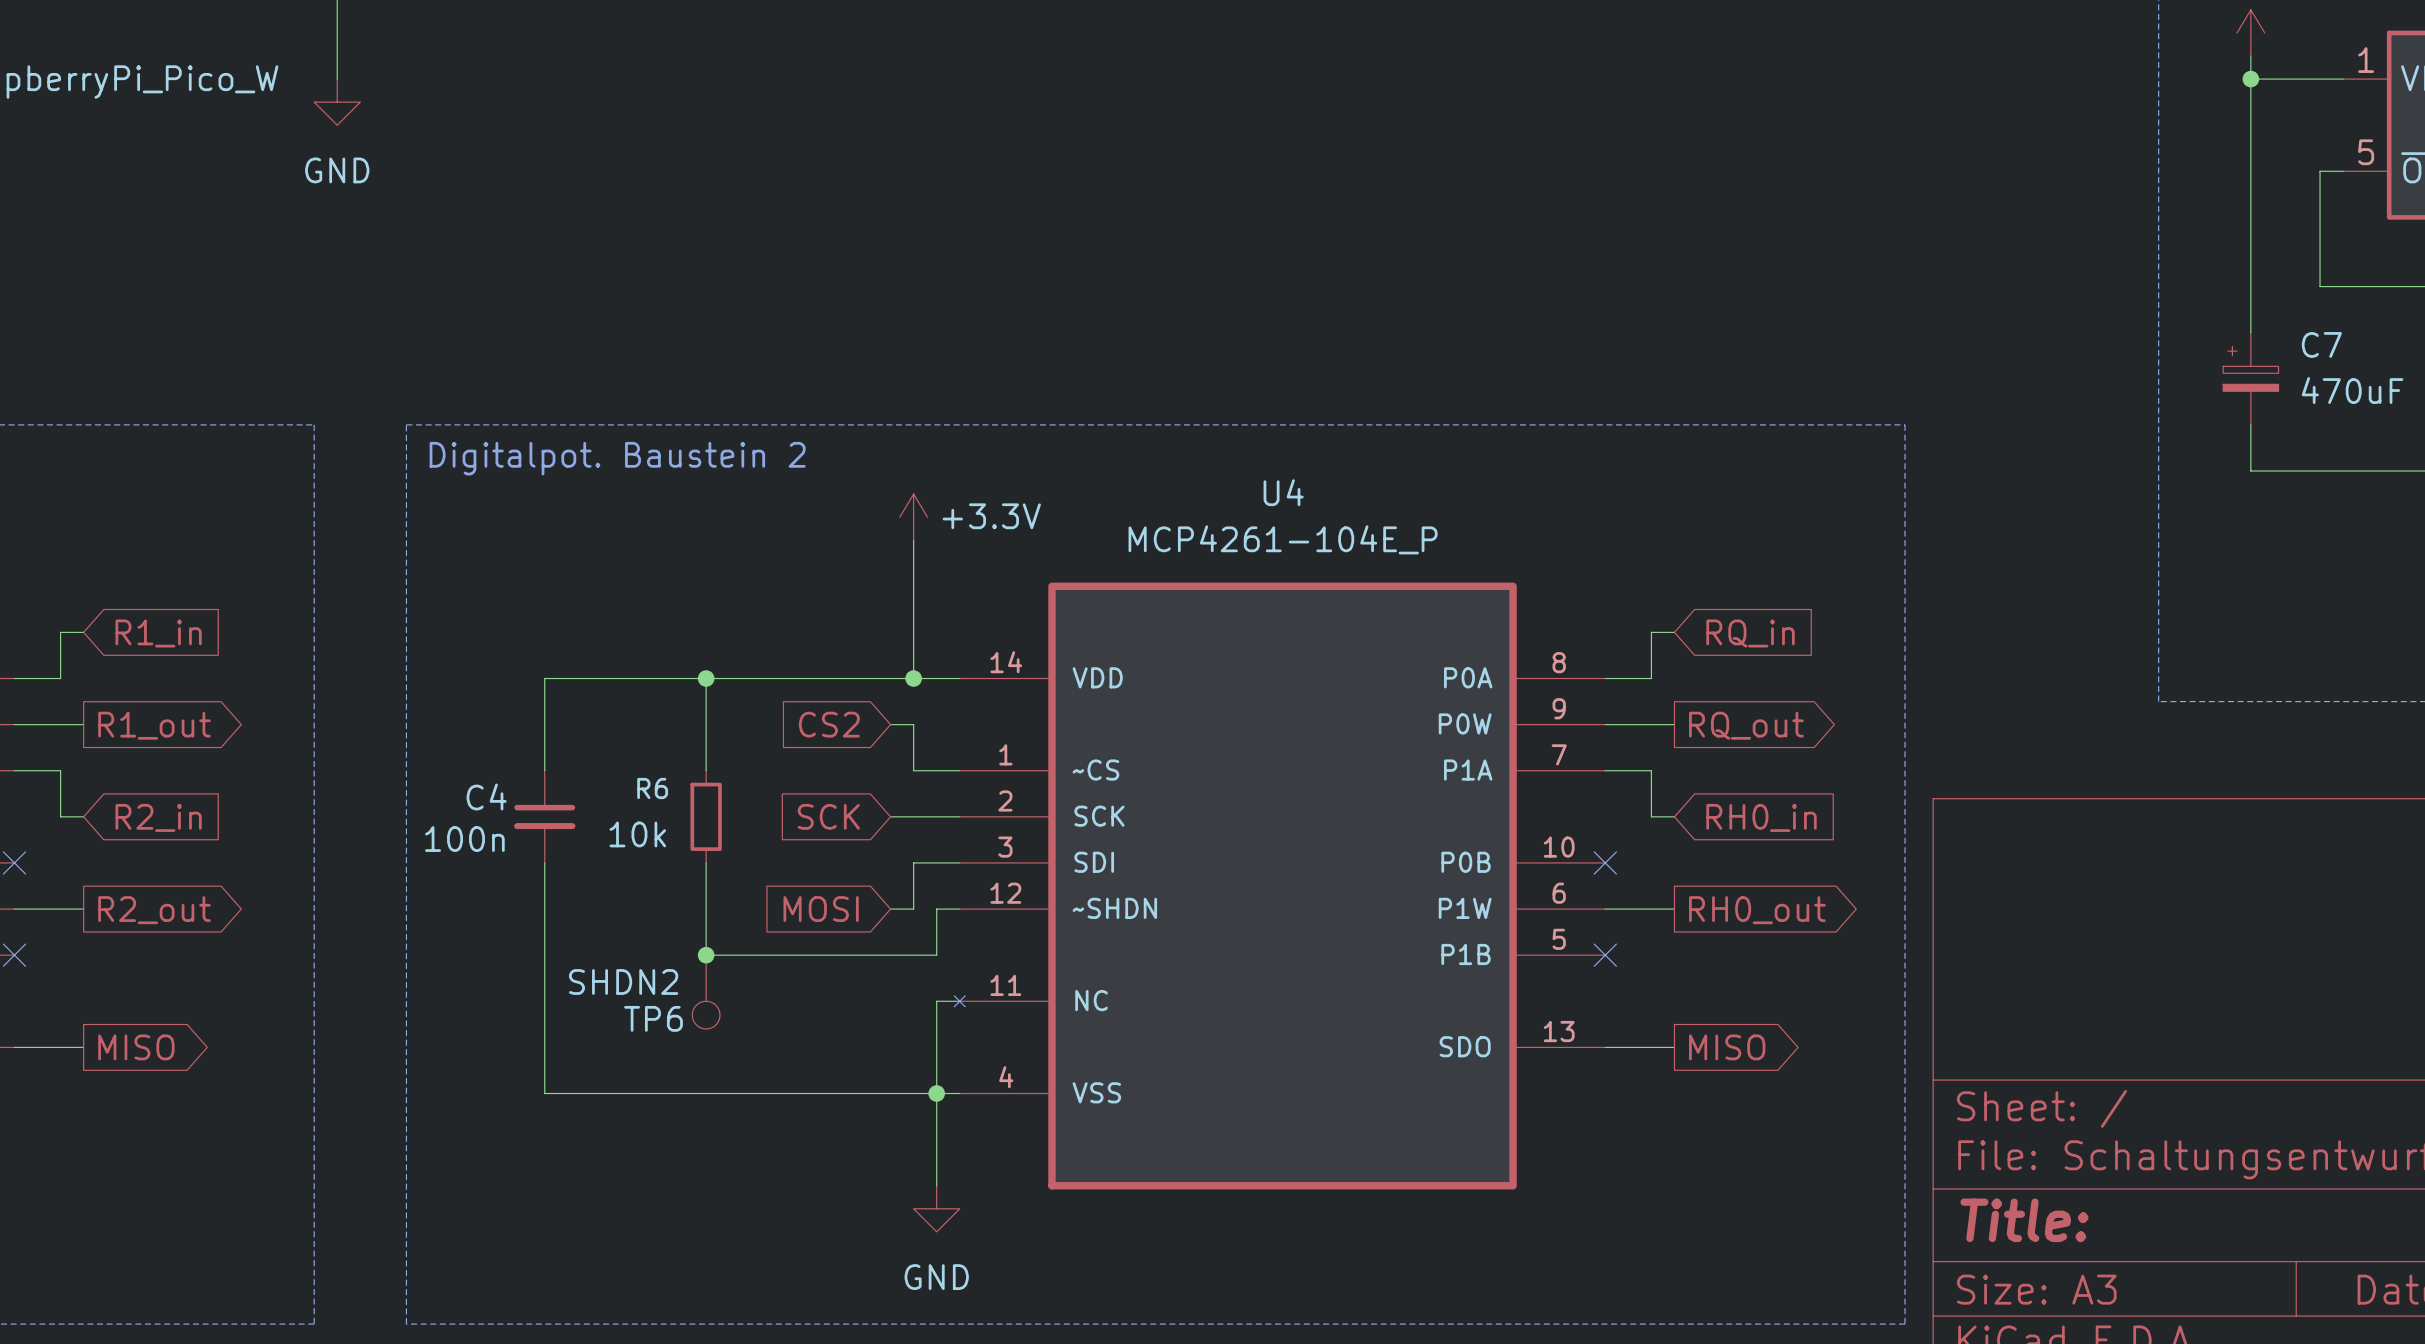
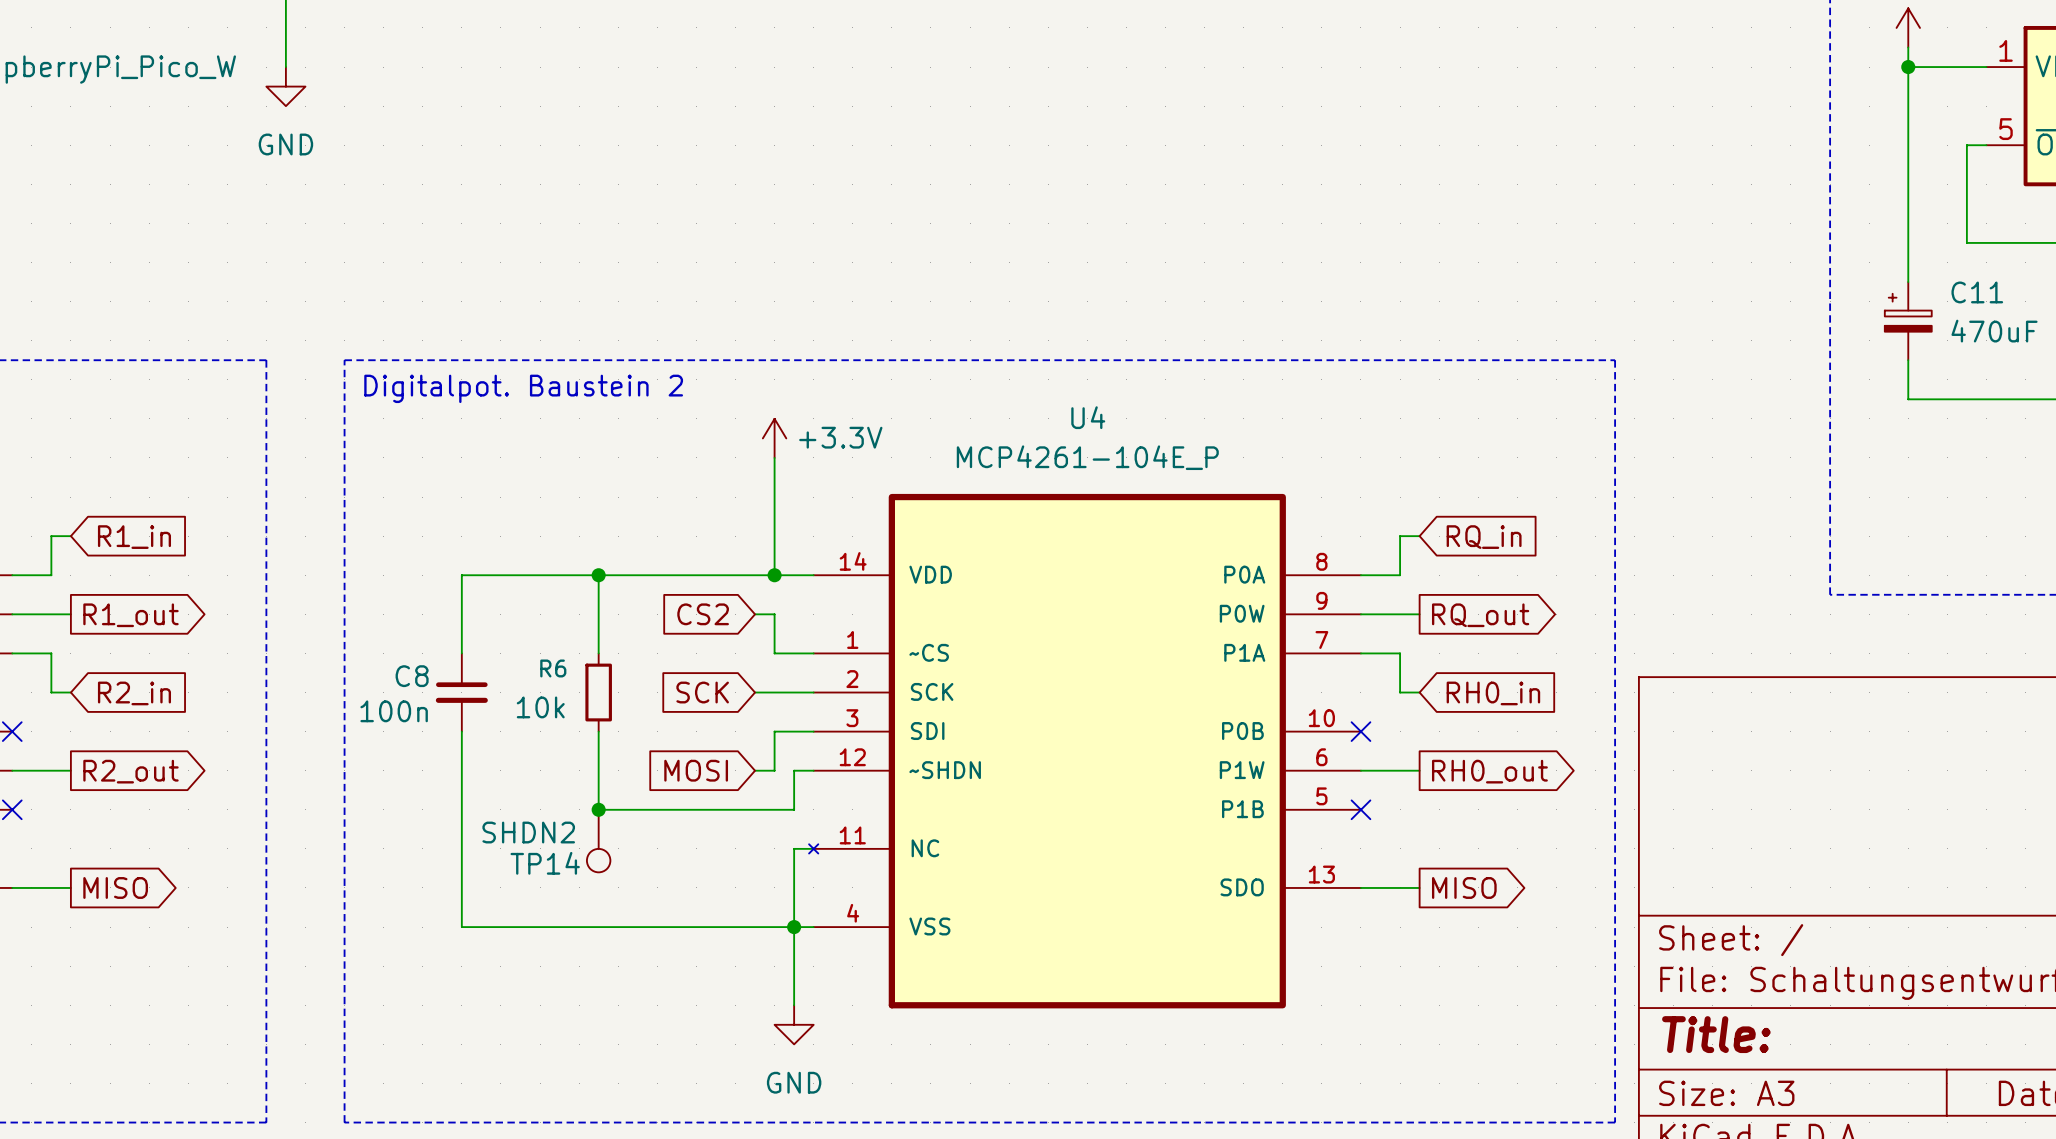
C7 name: C7 (2321, 344) -> C11 (1977, 292)
C4 name: C4 (486, 796) -> C8 (412, 676)
TP6 name: TP6 (653, 1018) -> TP14 (545, 863)

